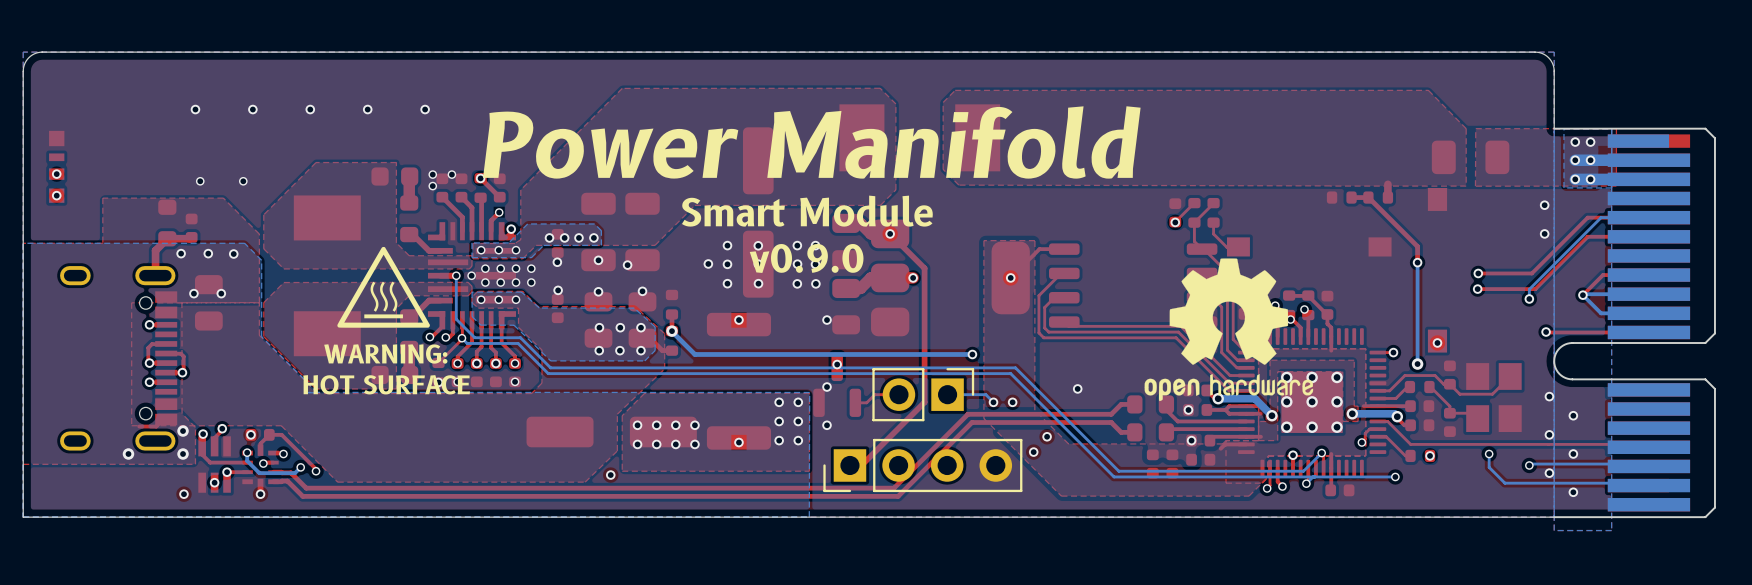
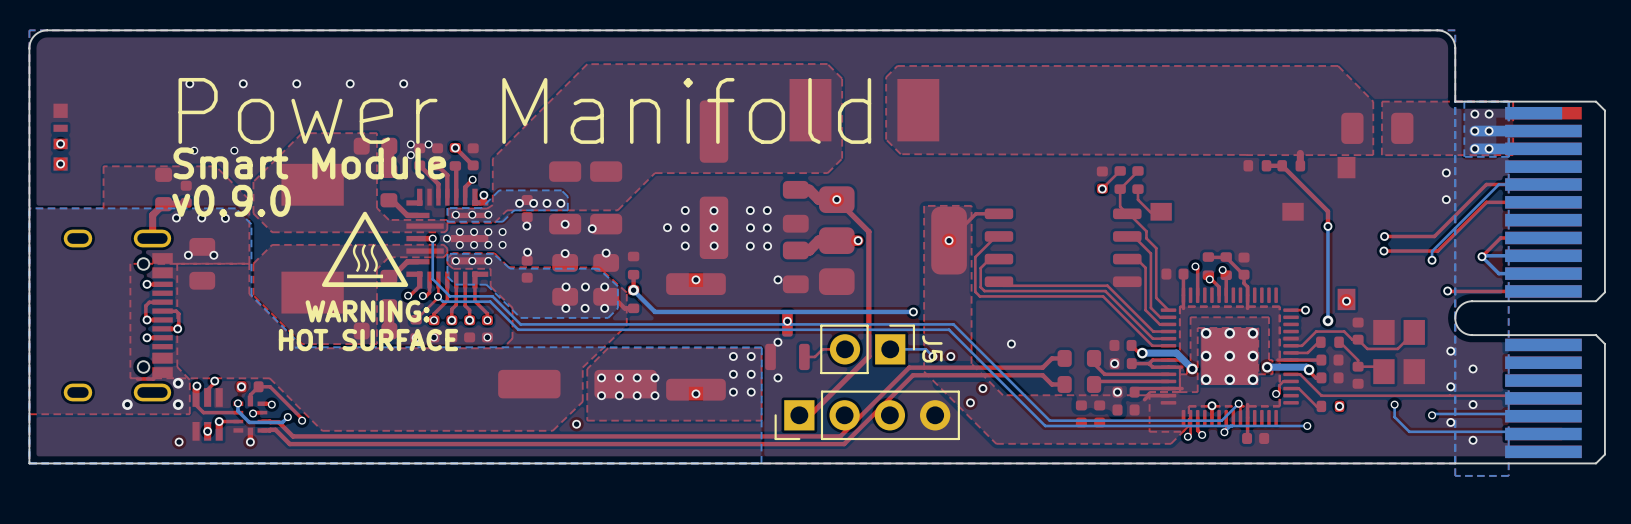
text: none -> Power Manifold (524, 110)
text: Power Manifold (811, 142) -> none
text: none -> Smart Module (309, 163)
text: Smart Module (807, 211) -> none
text: none -> v0.9.0 (231, 200)
text: v0.9.0 (806, 258) -> none
drawing: [1144, 258, 1314, 402] -> none
J5 name: none -> J5 (932, 348)

